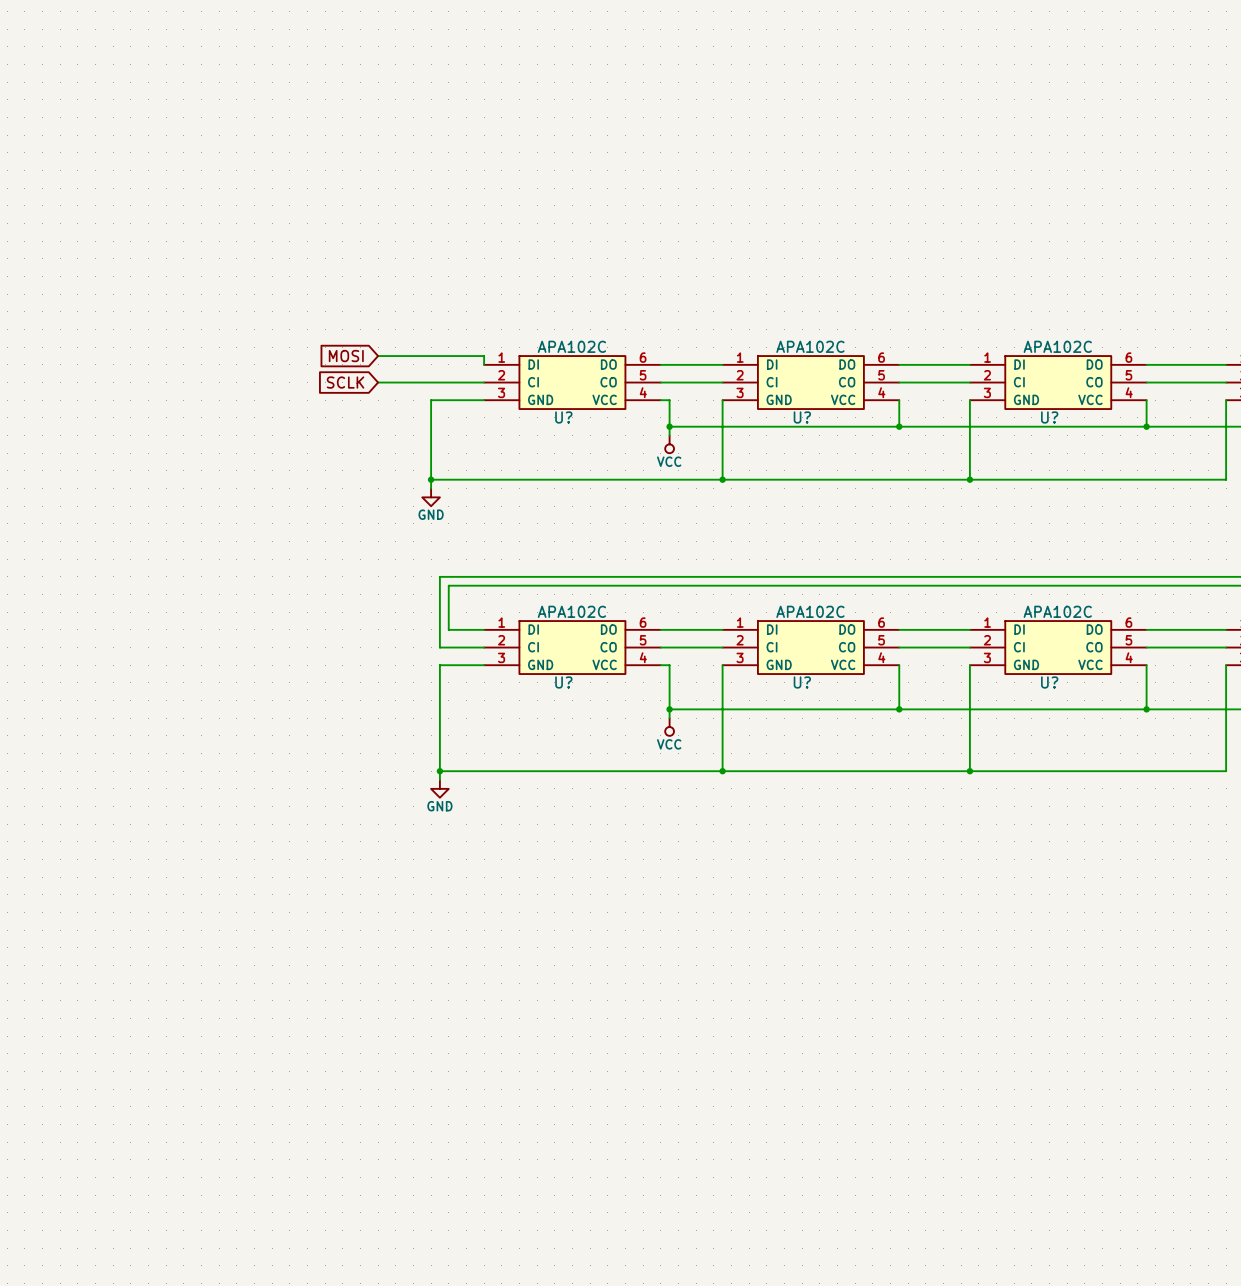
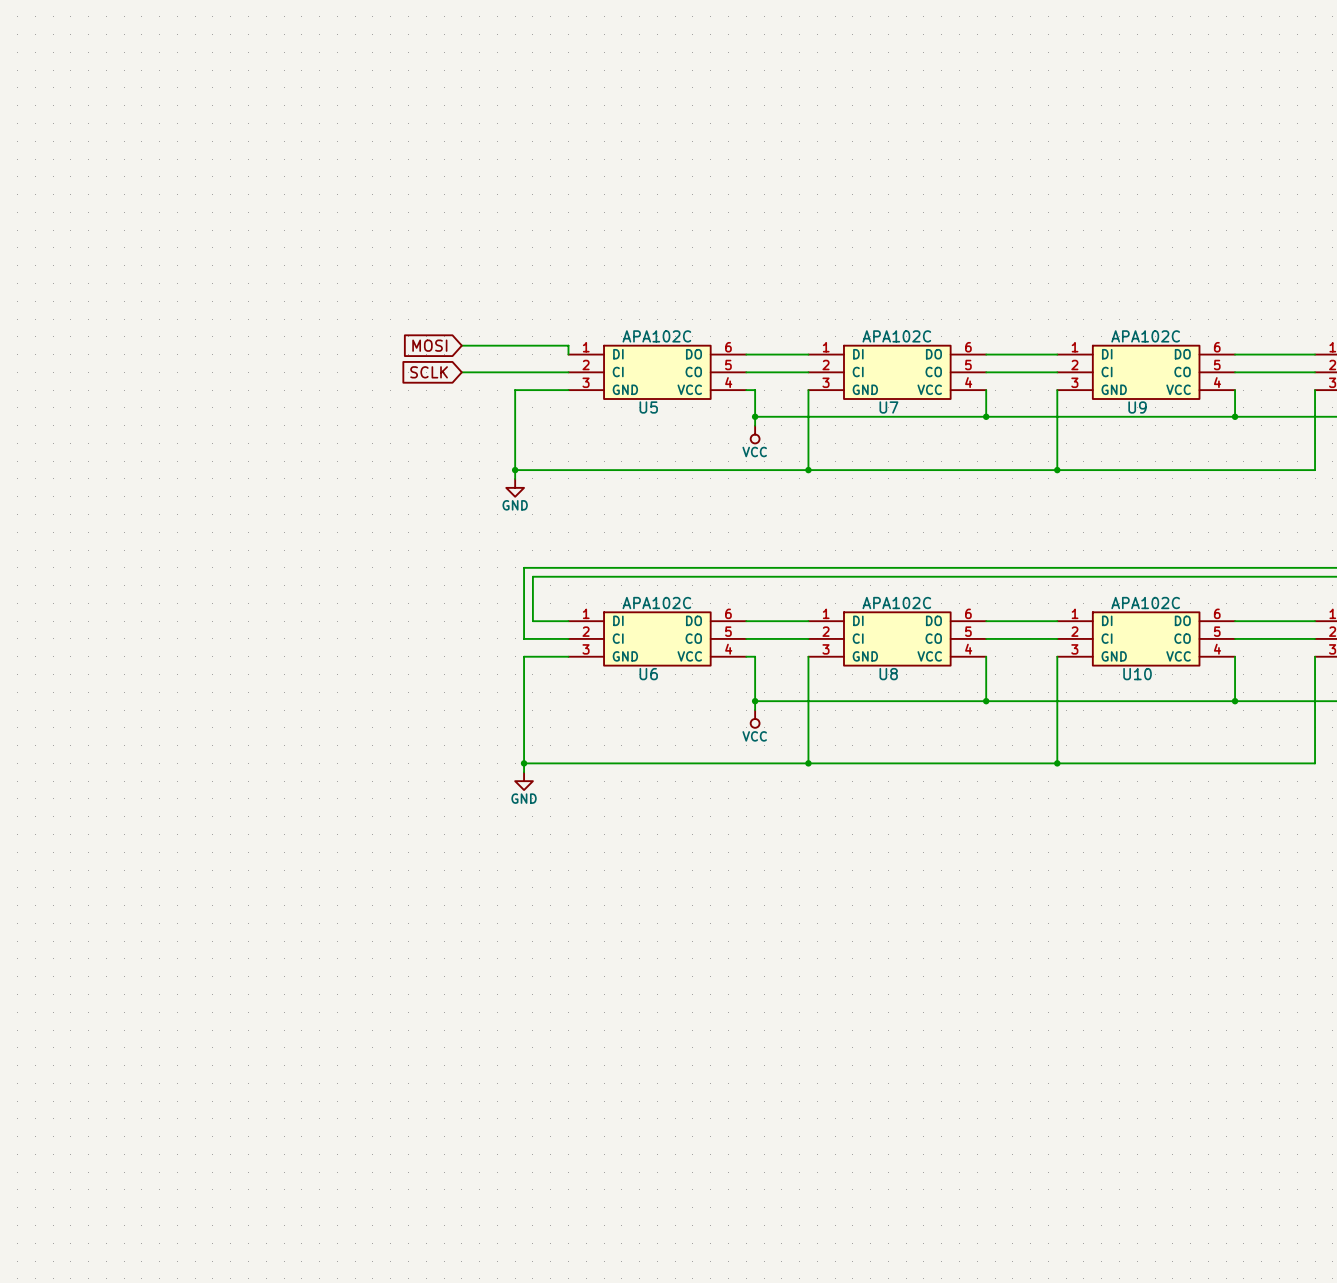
U? name: U? (563, 417) -> U5 (648, 407)
U? name: U? (802, 417) -> U7 (888, 407)
U? name: U? (1049, 417) -> U9 (1137, 407)
U? name: U? (563, 682) -> U6 (648, 674)
U? name: U? (802, 682) -> U8 (888, 674)
U? name: U? (1049, 682) -> U10 (1137, 674)

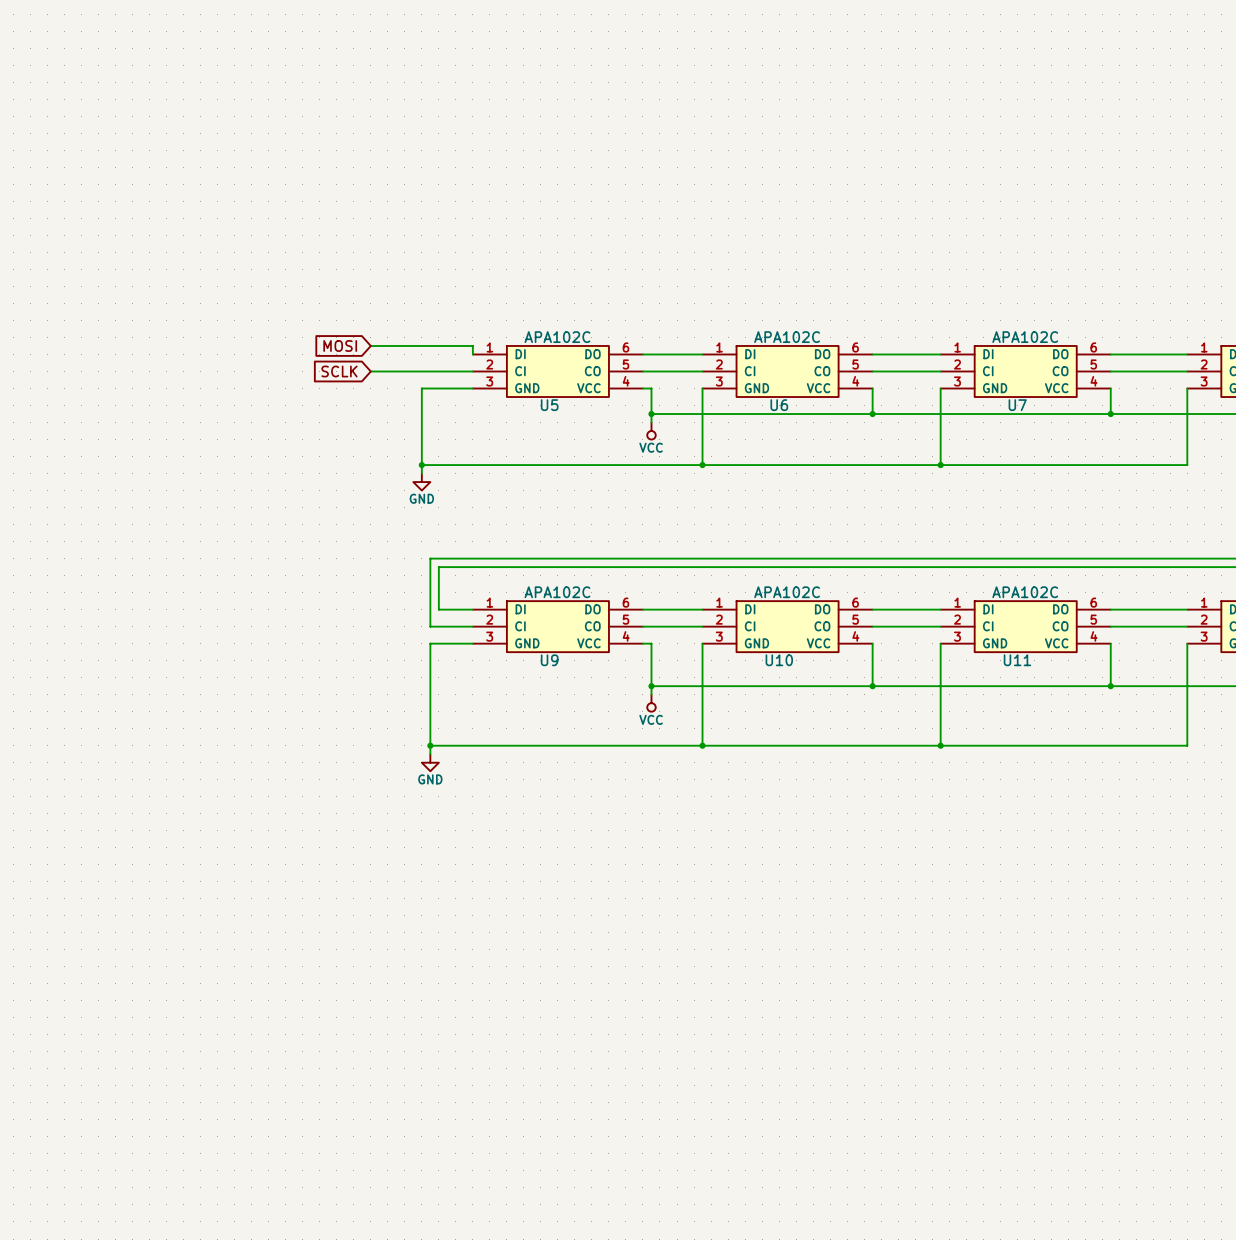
U7 name: U7 (888, 407) -> U6 (779, 405)
U9 name: U9 (1137, 407) -> U7 (1017, 405)
U6 name: U6 (648, 674) -> U9 (549, 660)
U8 name: U8 (888, 674) -> U10 (779, 660)
U10 name: U10 (1137, 674) -> U11 (1017, 660)

